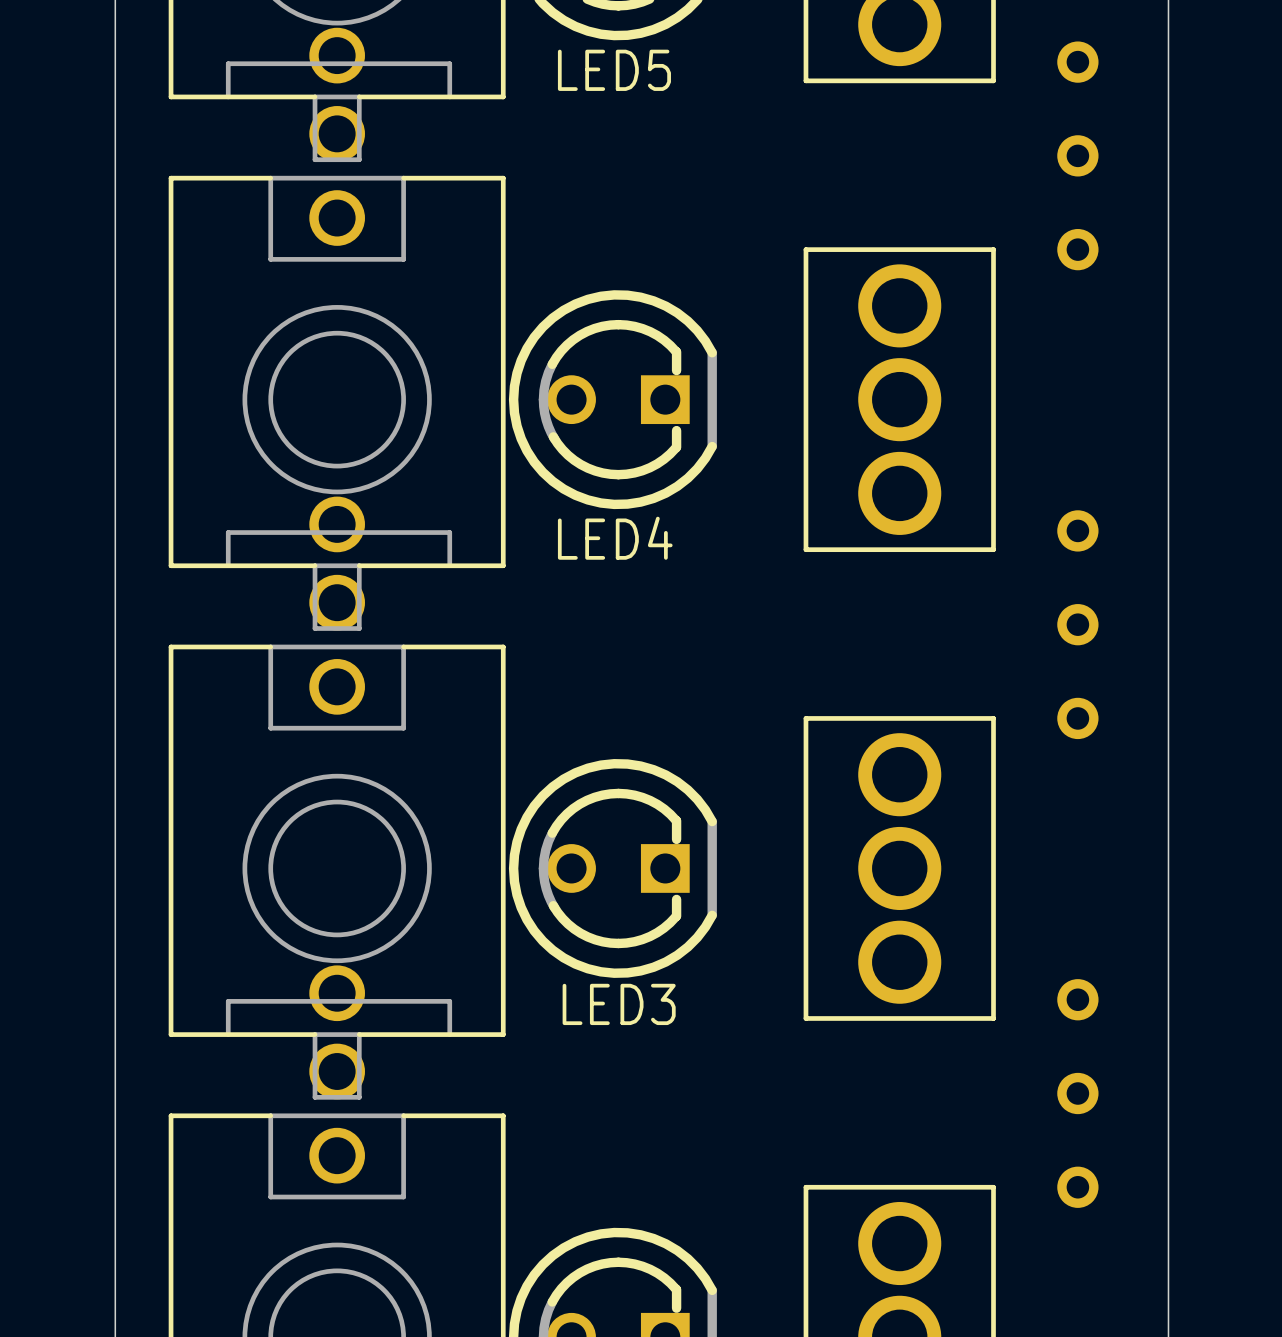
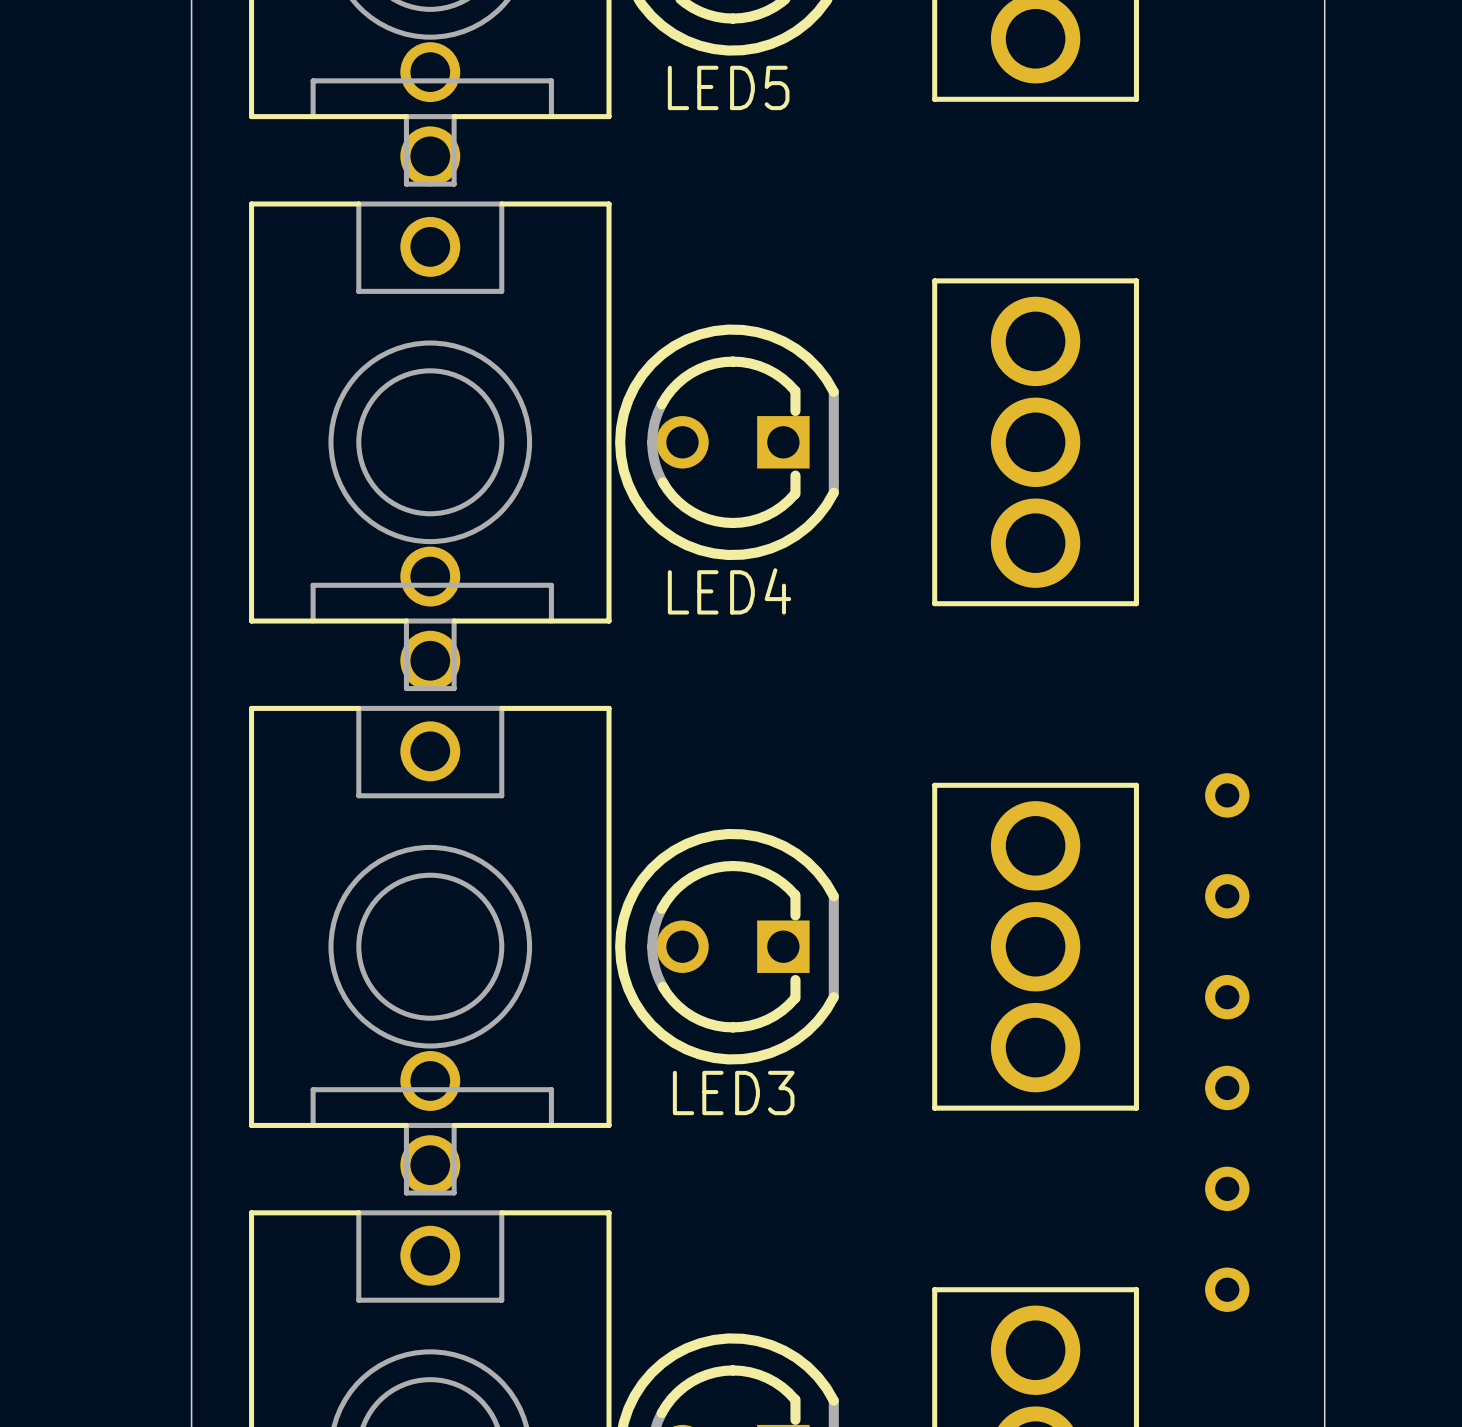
part: (1077, 155) -> none
part position: (1077, 624) -> (1227, 896)

